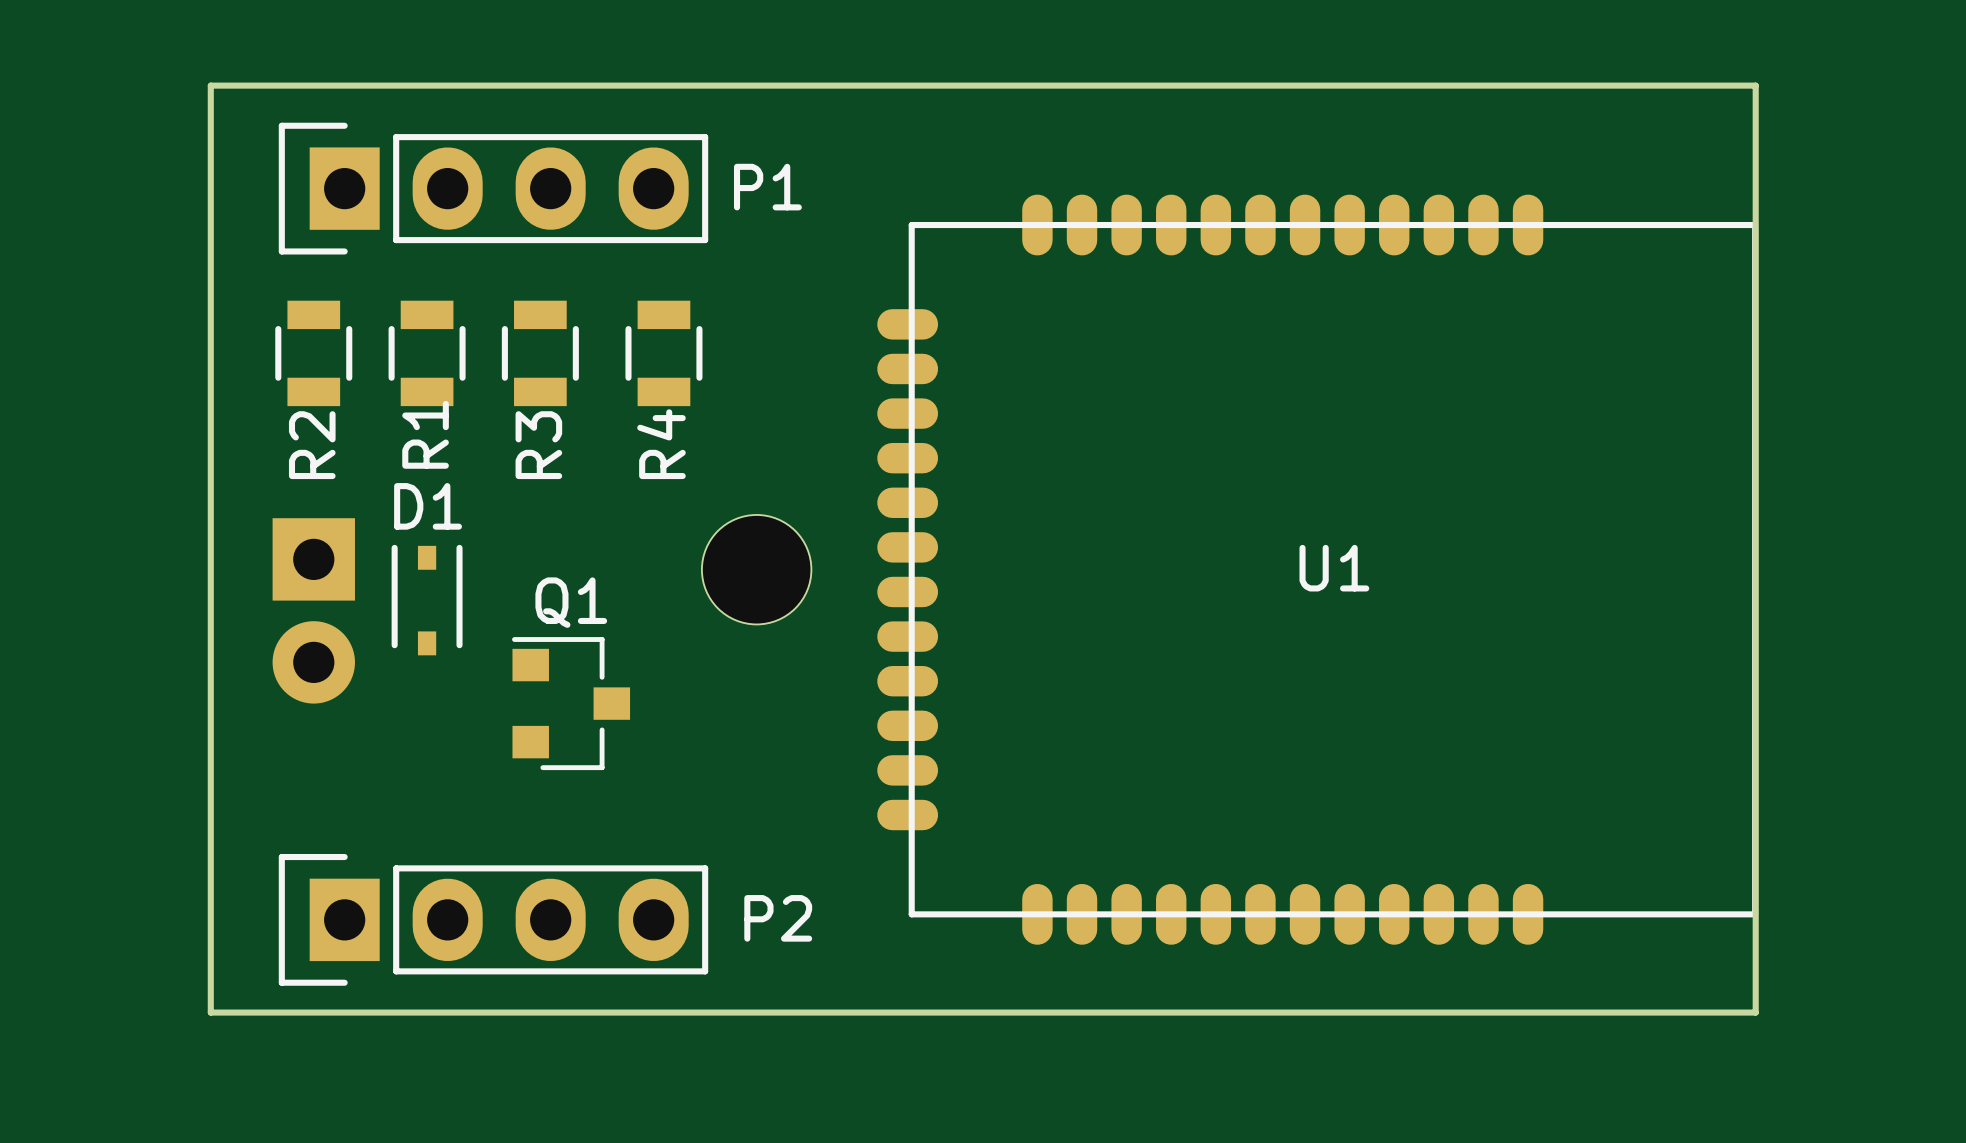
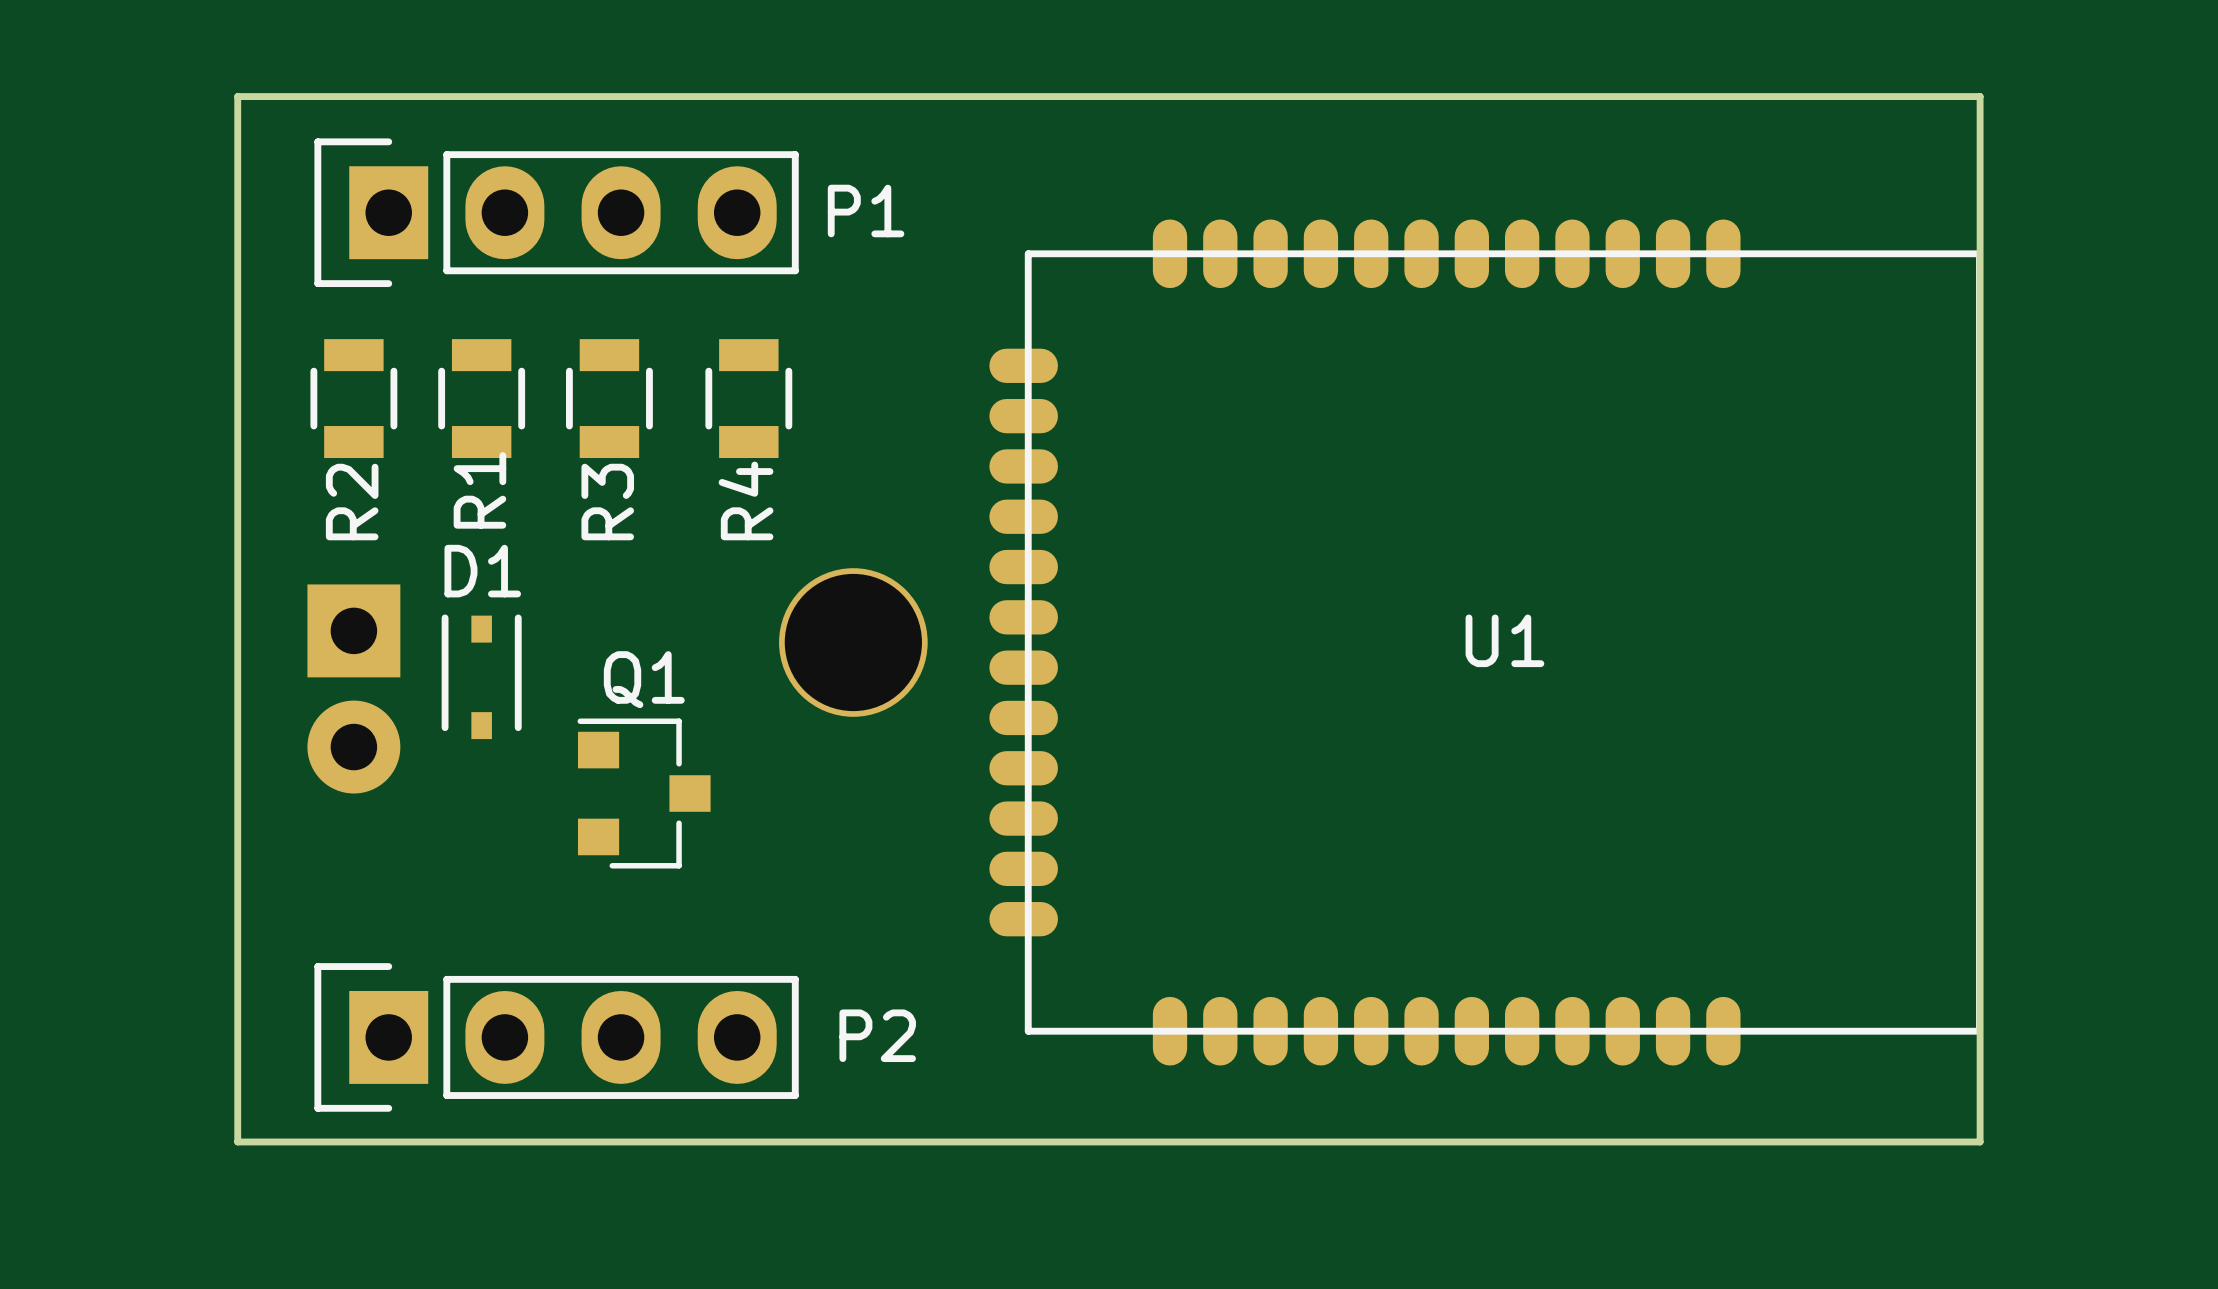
part footprint: [701, 514, 812, 625] -> [779, 568, 928, 717]

